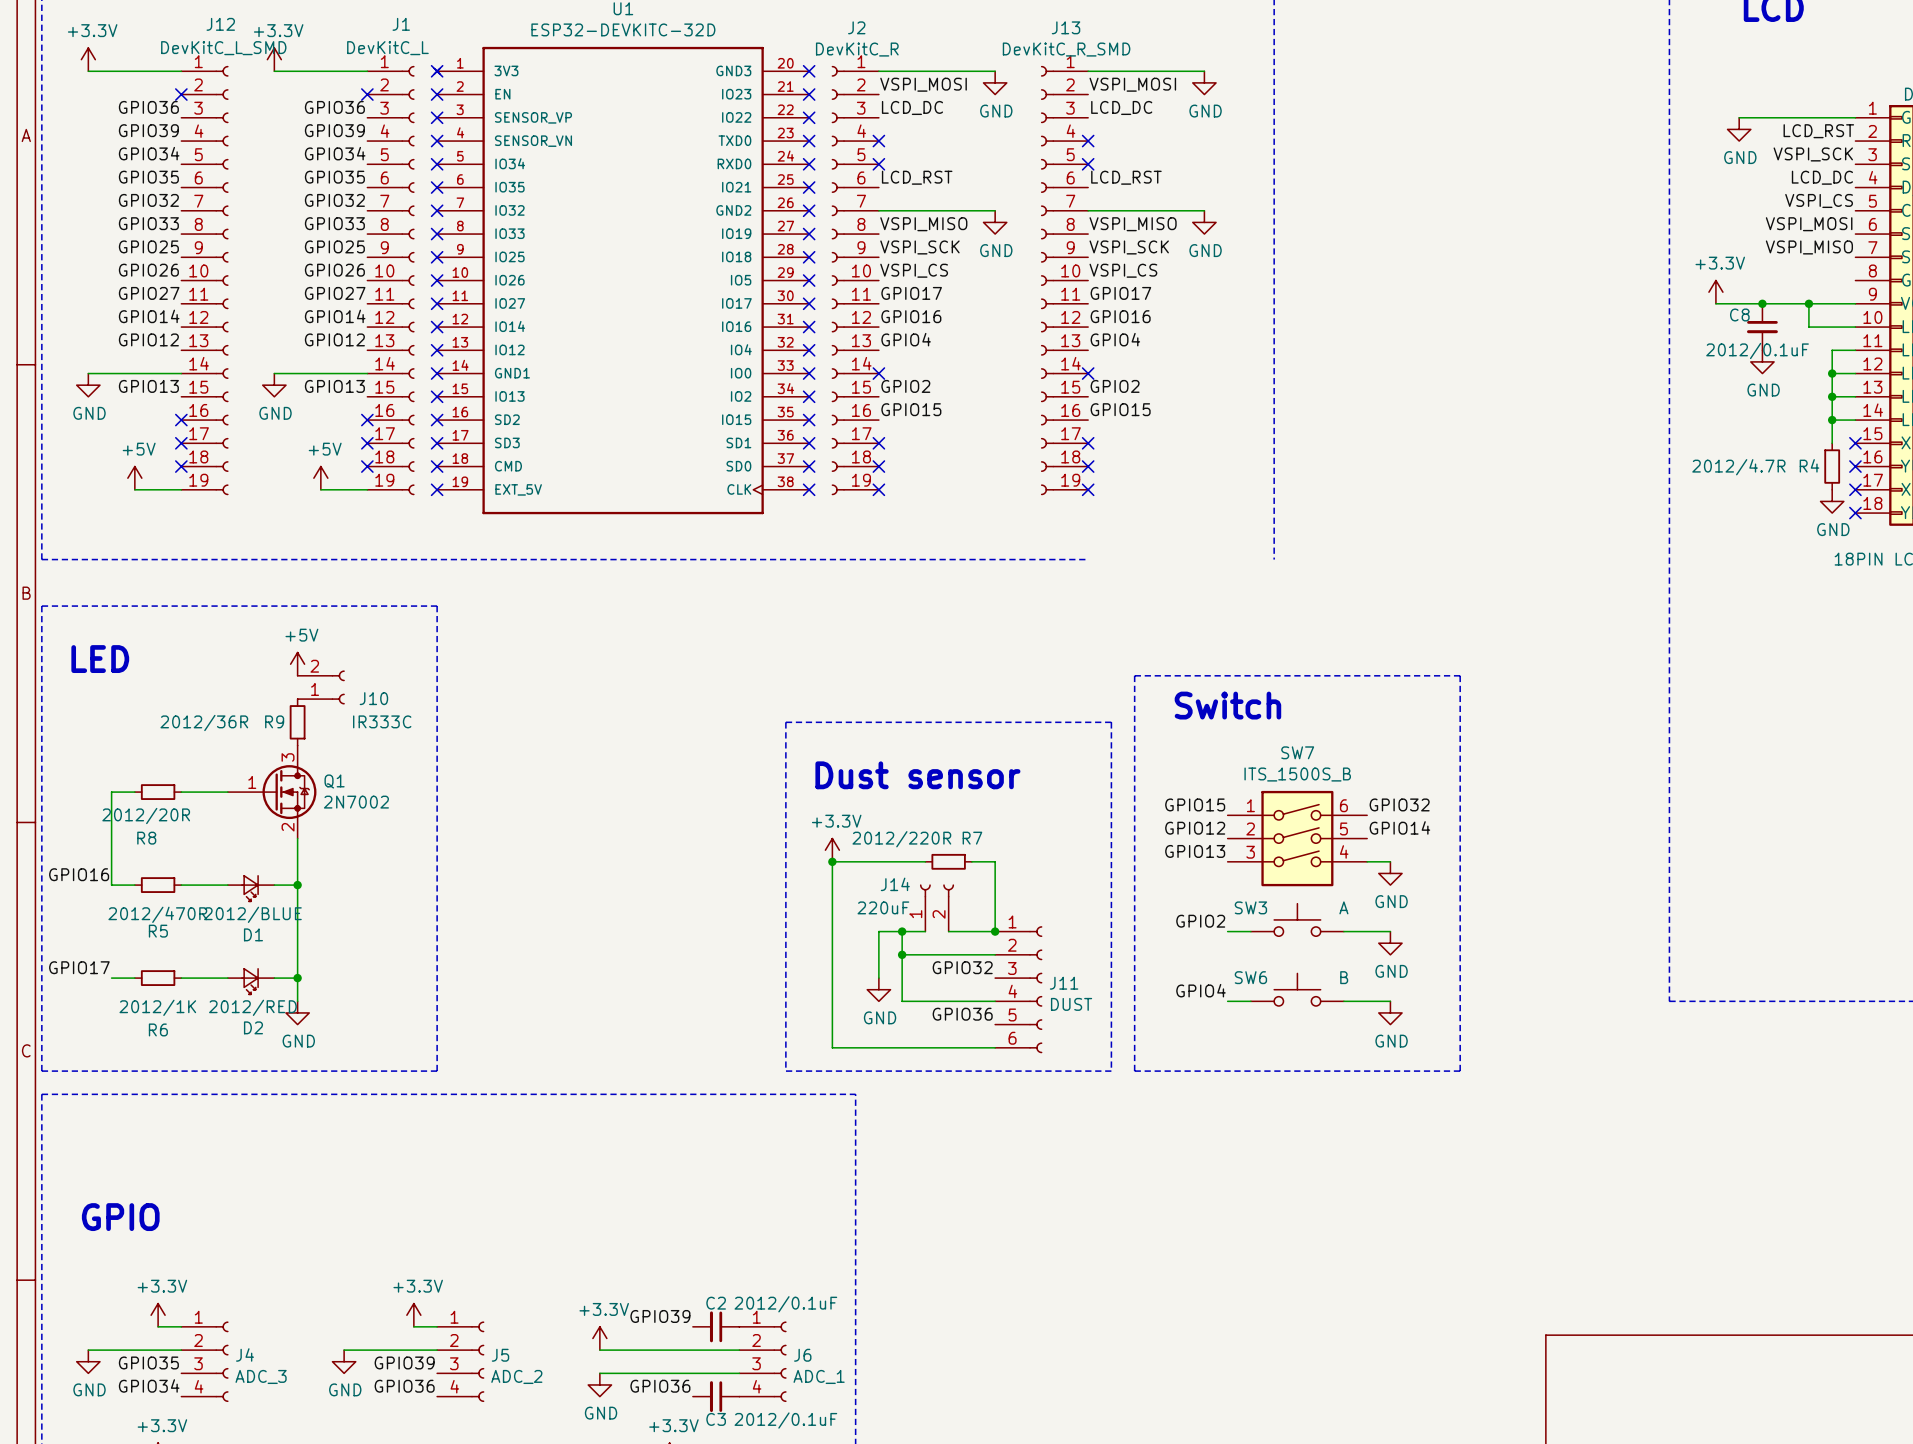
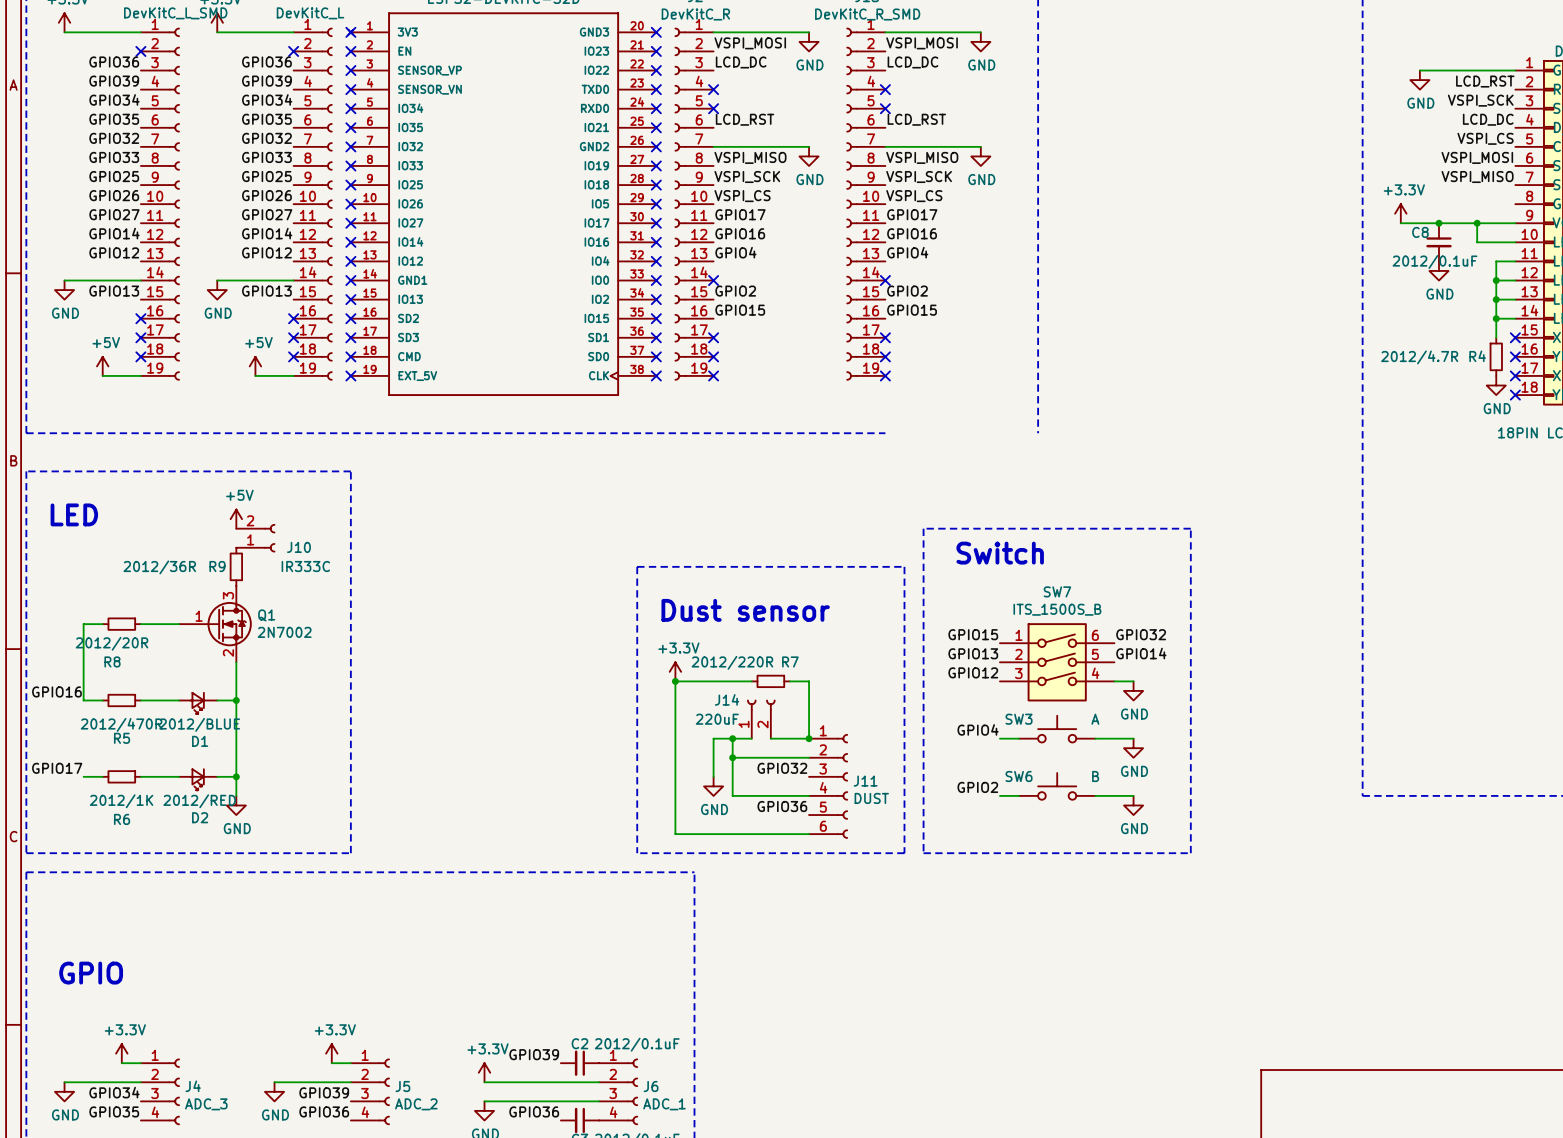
label: GPIO12 (1195, 828) -> GPIO13 (973, 653)
label: GPIO13 (1195, 851) -> GPIO12 (973, 672)
label: GPIO2 (1200, 921) -> GPIO4 (978, 729)
label: GPIO4 (1200, 990) -> GPIO2 (977, 787)
label: GPIO35 (148, 1362) -> GPIO34 (114, 1092)
label: GPIO34 (149, 1385) -> GPIO35 (114, 1111)

